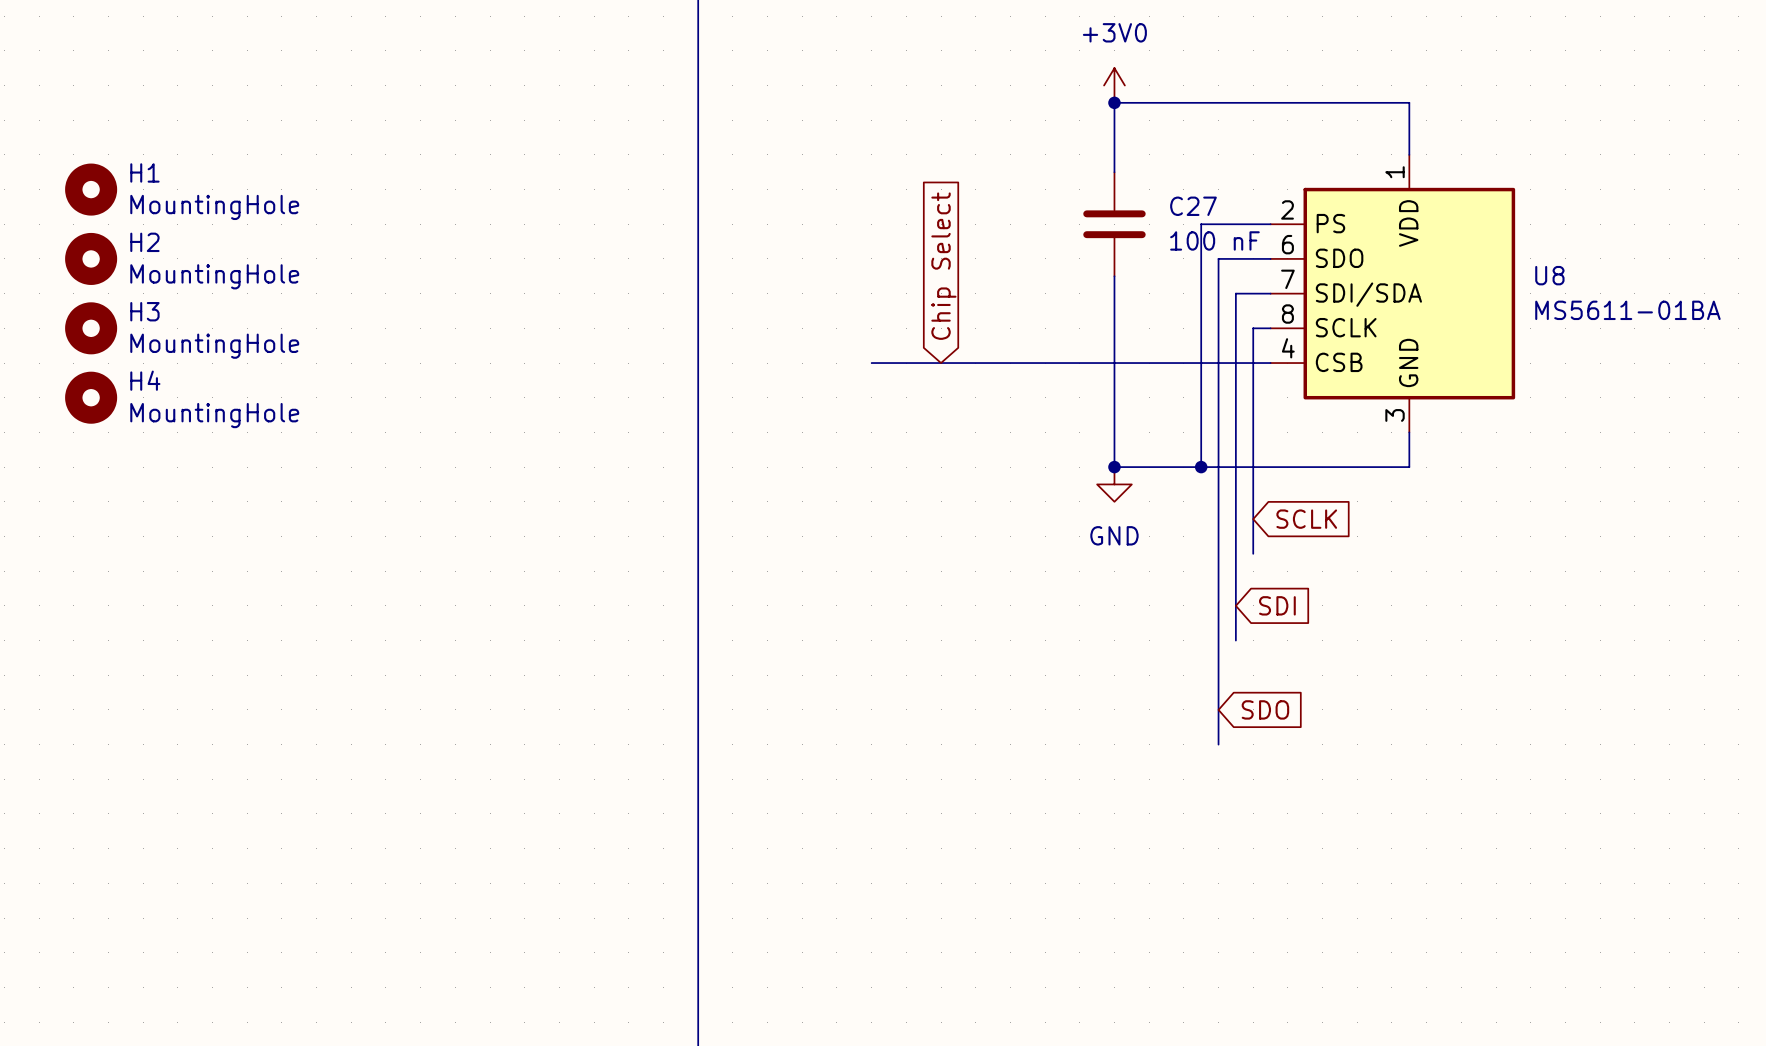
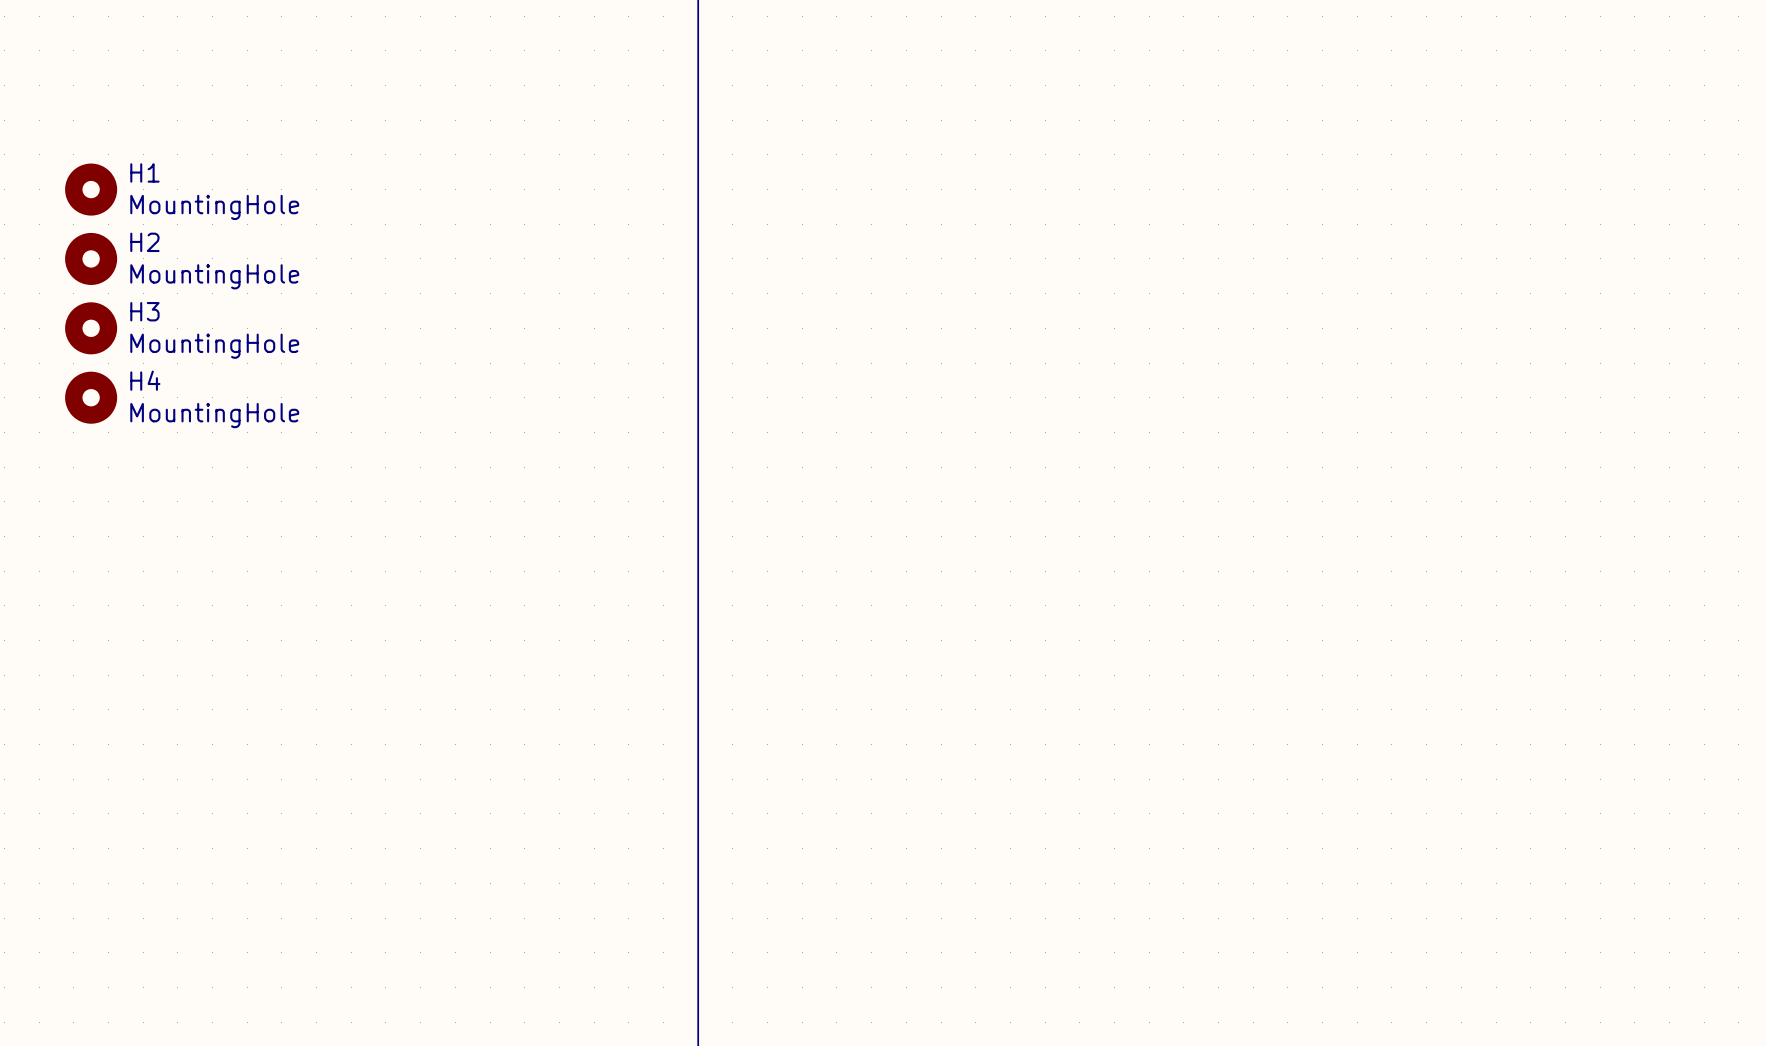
power symbol: +3V0 (1114, 85) -> none
junction: (1114, 102) -> none
wire: (1409, 154) (1409, 102) (1114, 102) (1114, 172) -> none
C27: 100 nF (1114, 224) -> none
wire: (1270, 224) (1201, 224) (1201, 467) -> none
wire: (1270, 258) (1218, 258) (1218, 744) -> none
global label: Chip Select (943, 266) -> none
wire: (1114, 276) (1114, 467) (1409, 467) (1409, 432) -> none
wire: (1270, 293) (1235, 293) (1235, 640) -> none
U8: MS5611-01BA (1392, 293) -> none
wire: (1270, 328) (1253, 328) (1253, 553) -> none
wire: (871, 363) (1270, 363) -> none
junction: (1114, 467) -> none
junction: (1201, 467) -> none
power symbol: GND (1114, 484) -> none
global label: SCLK (1306, 519) -> none
global label: SDI (1277, 605) -> none
global label: SDO (1265, 709) -> none

